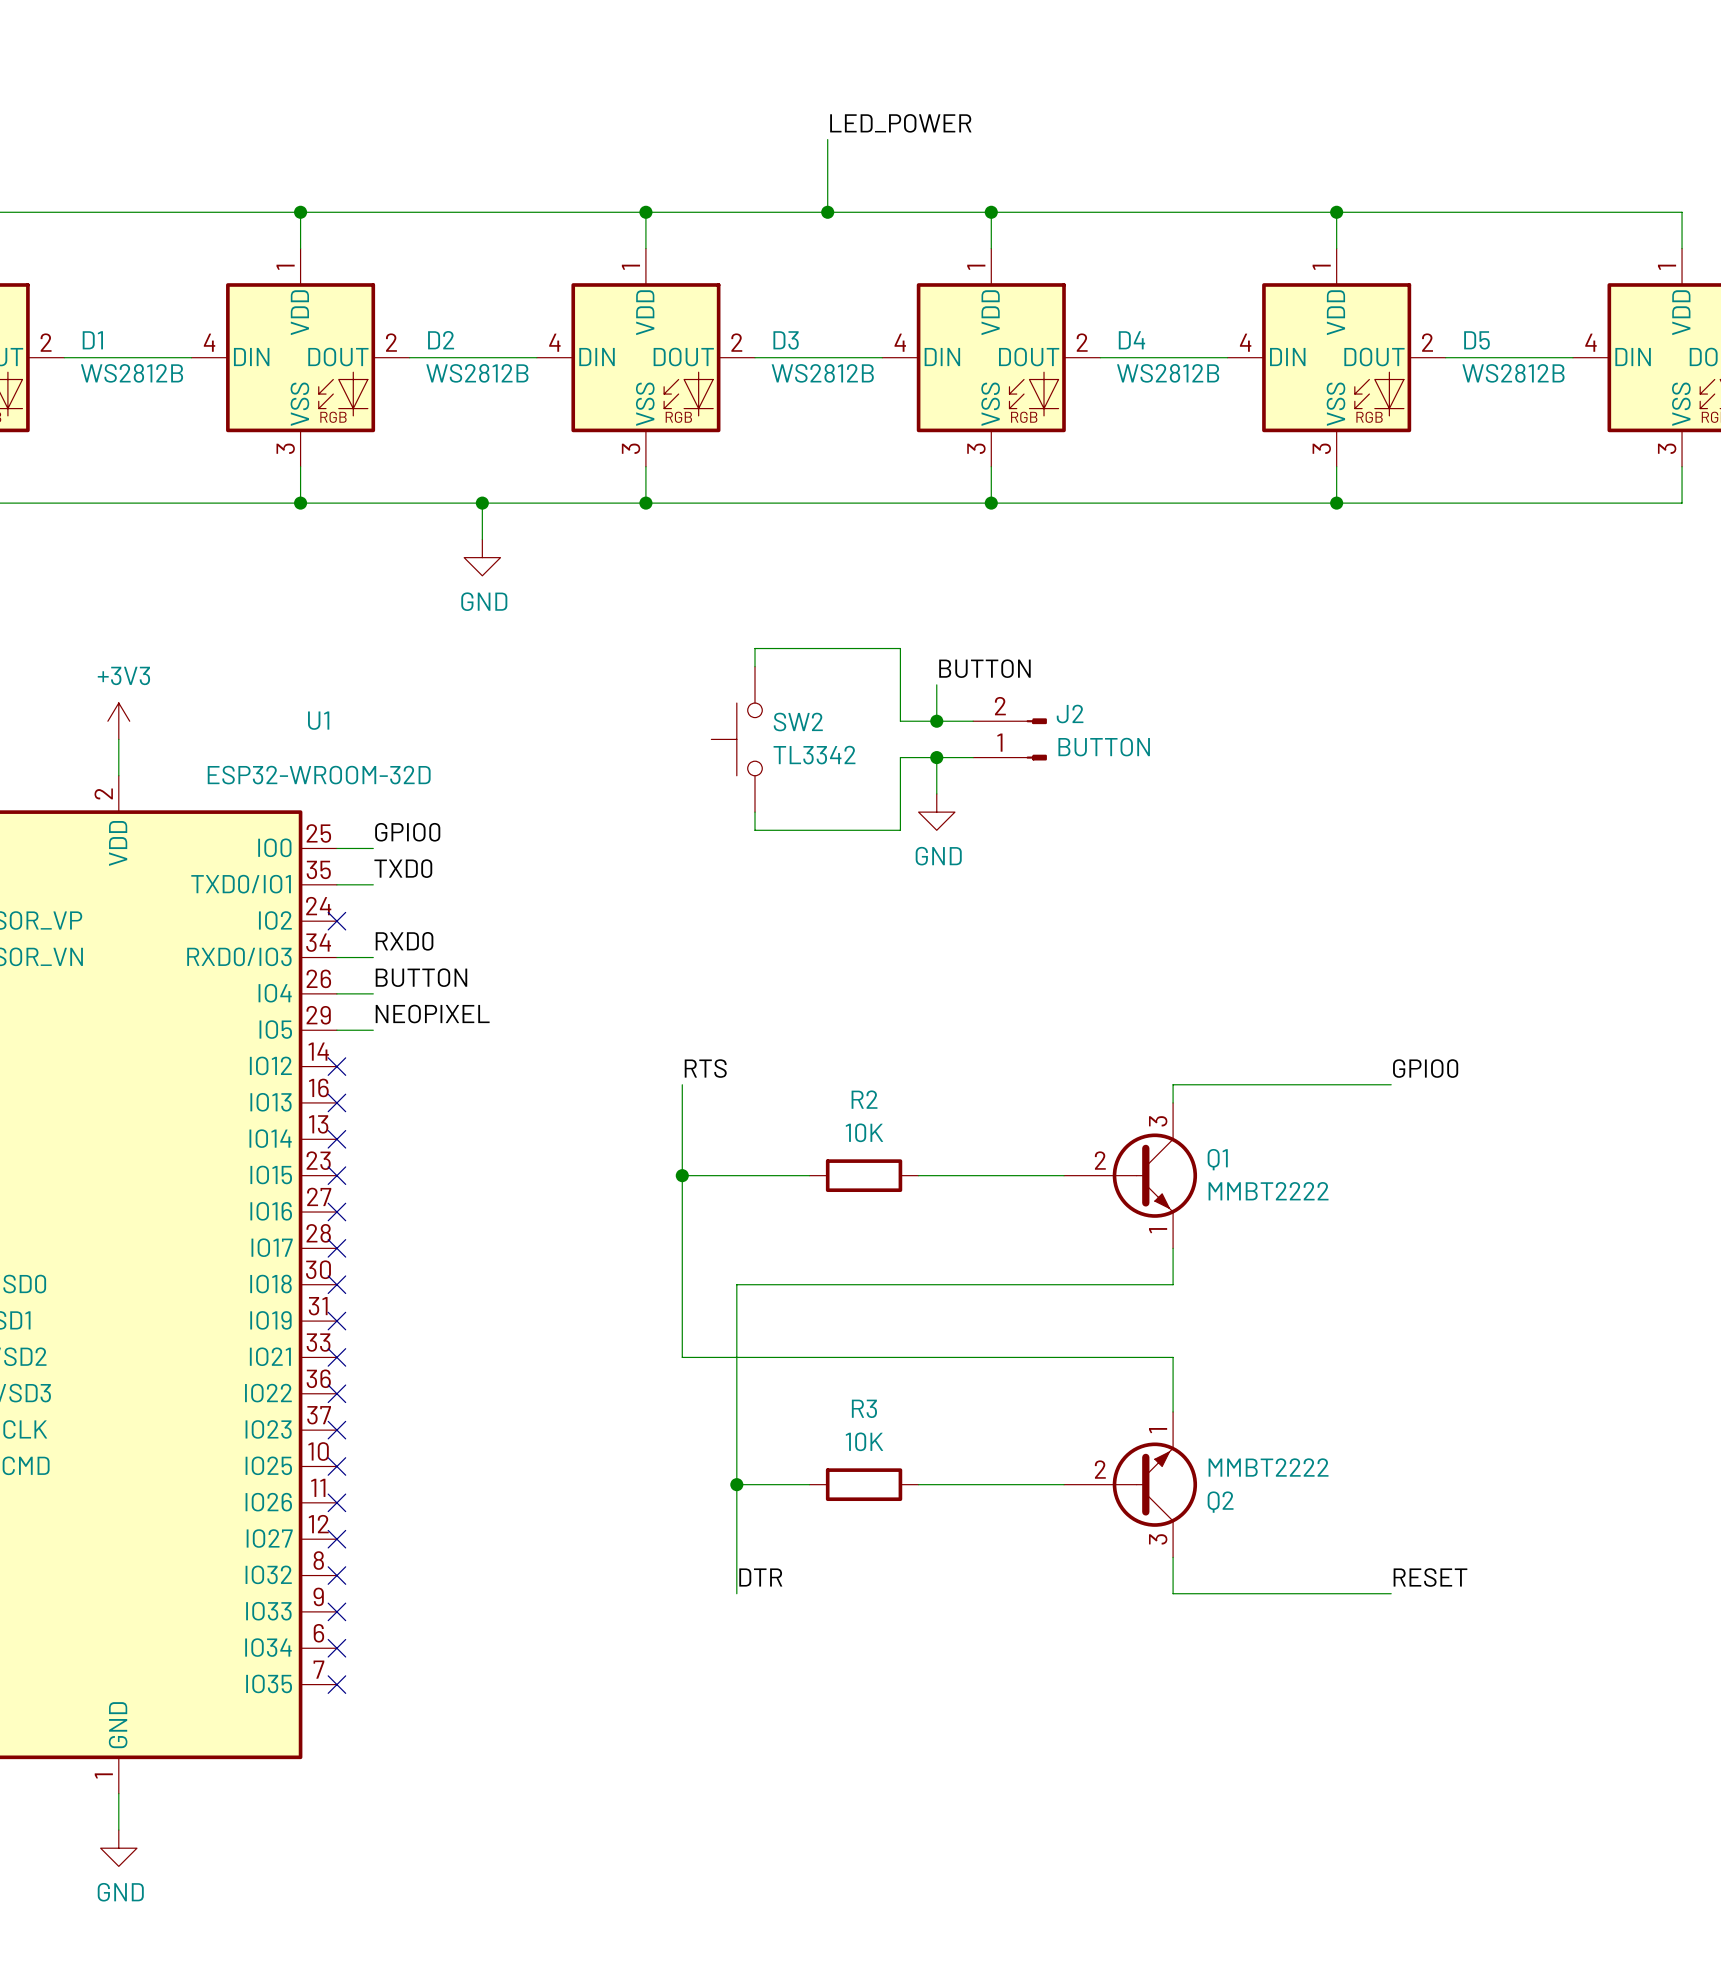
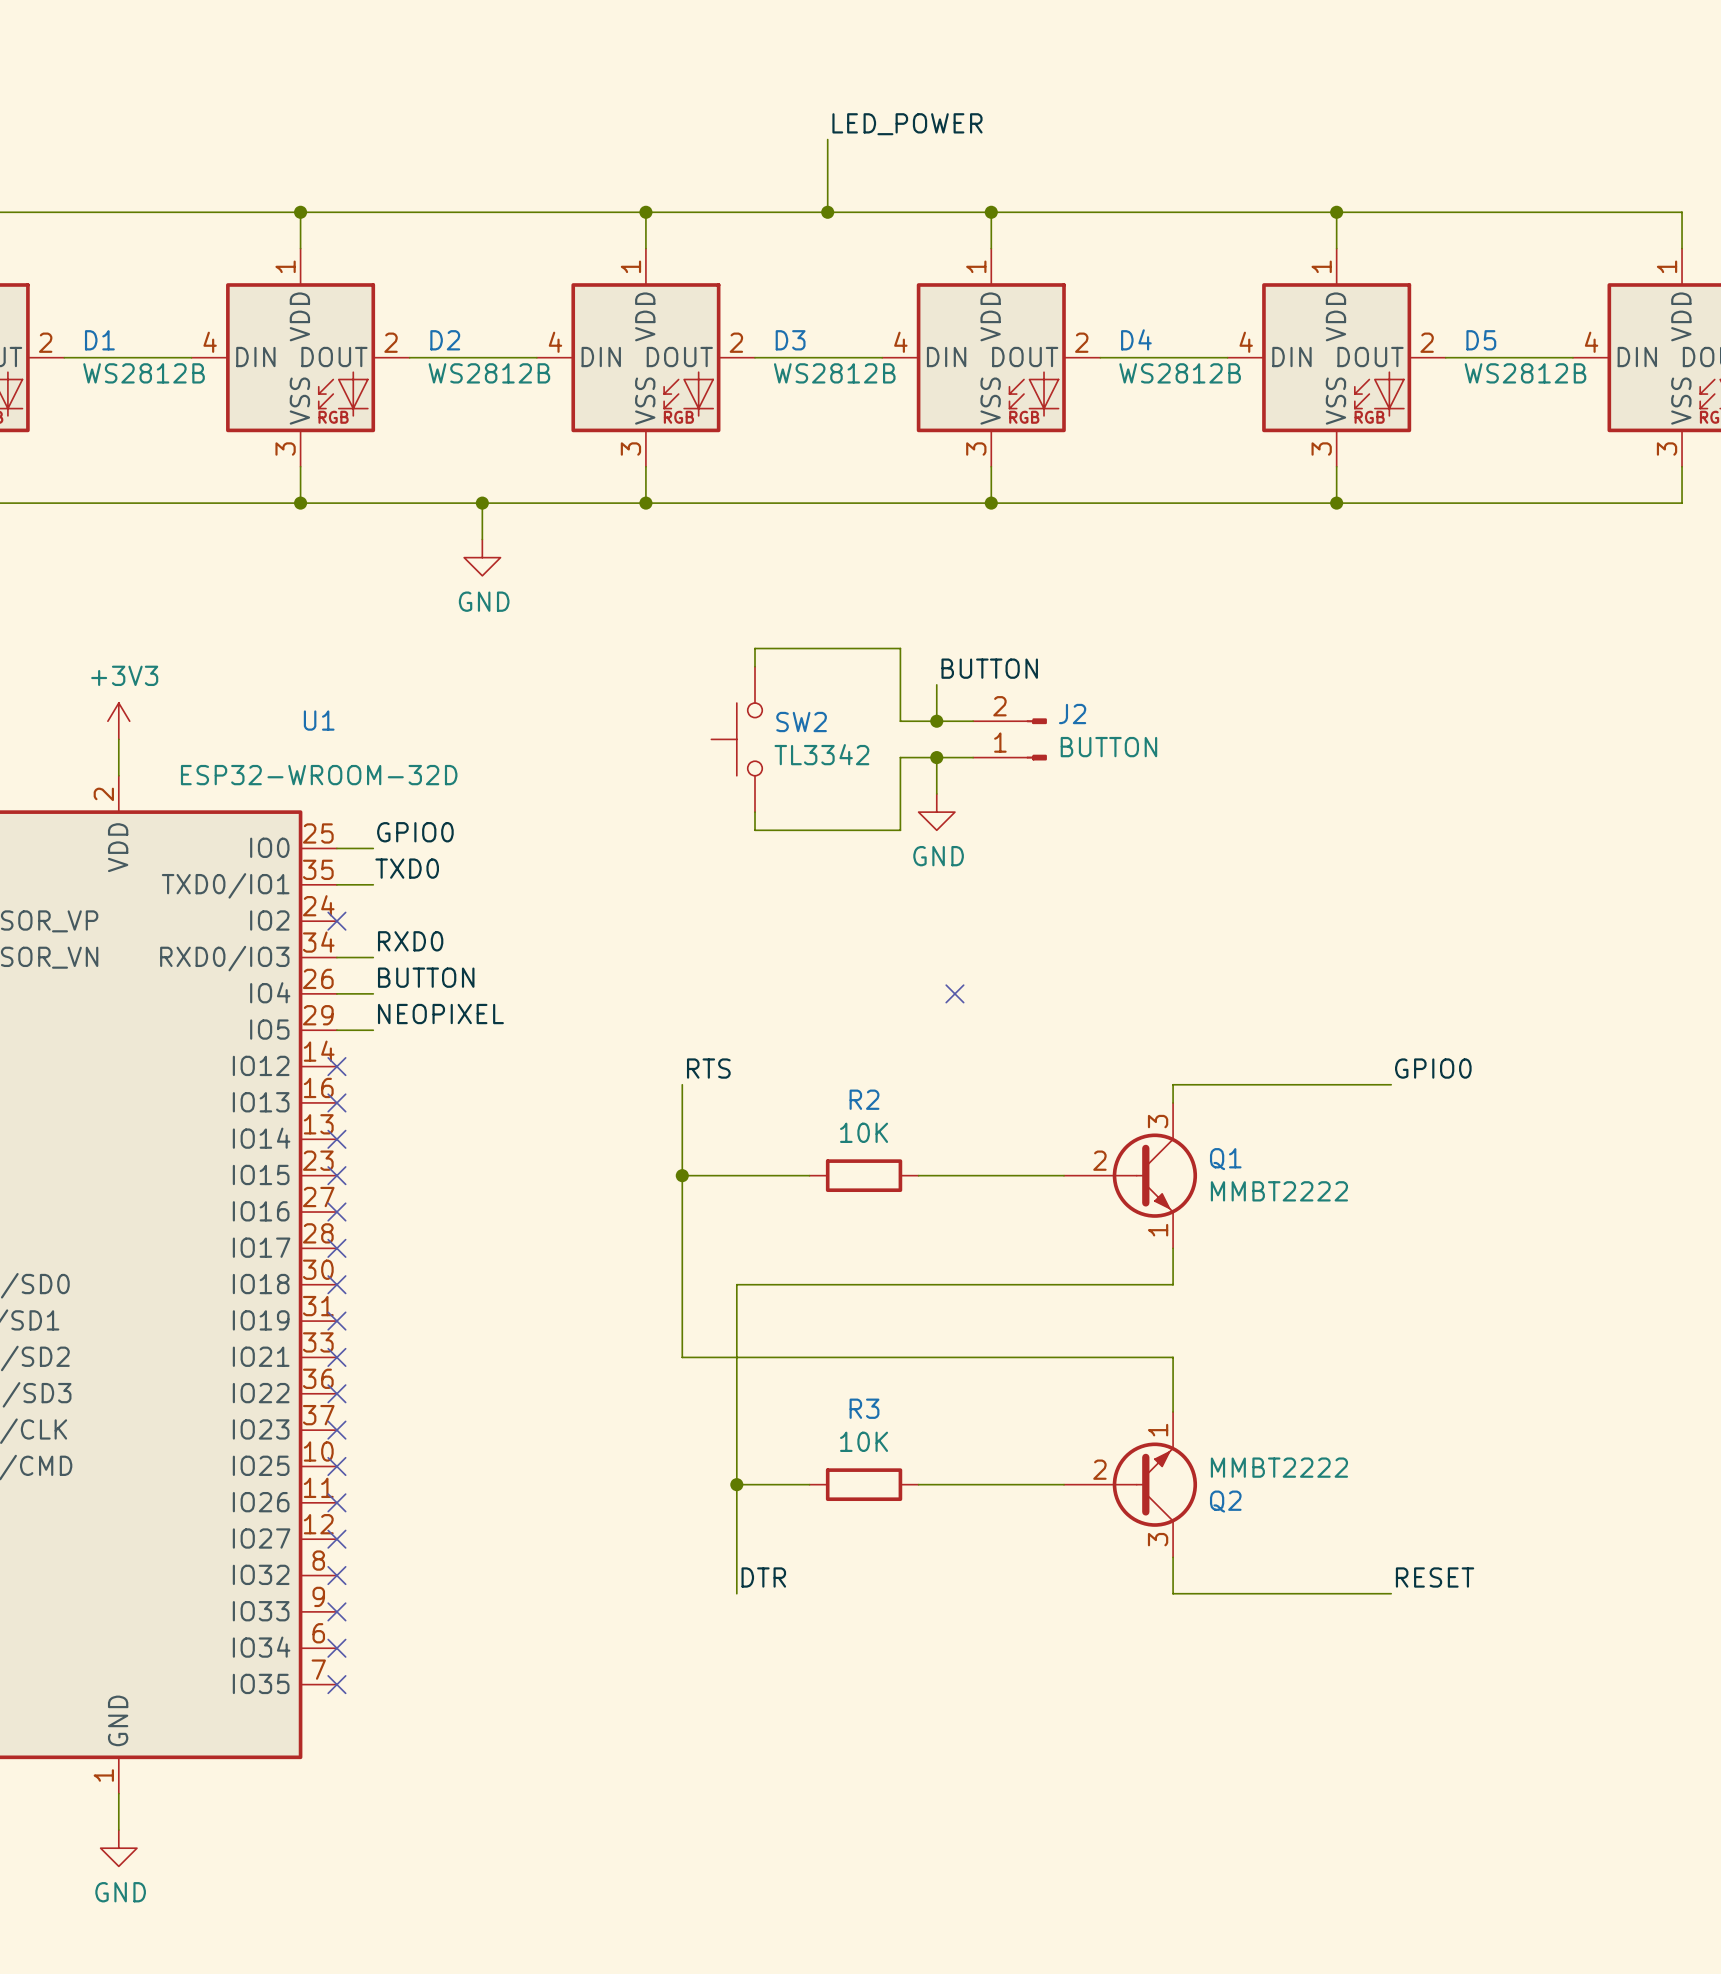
no-connect mark: none -> (954, 993)

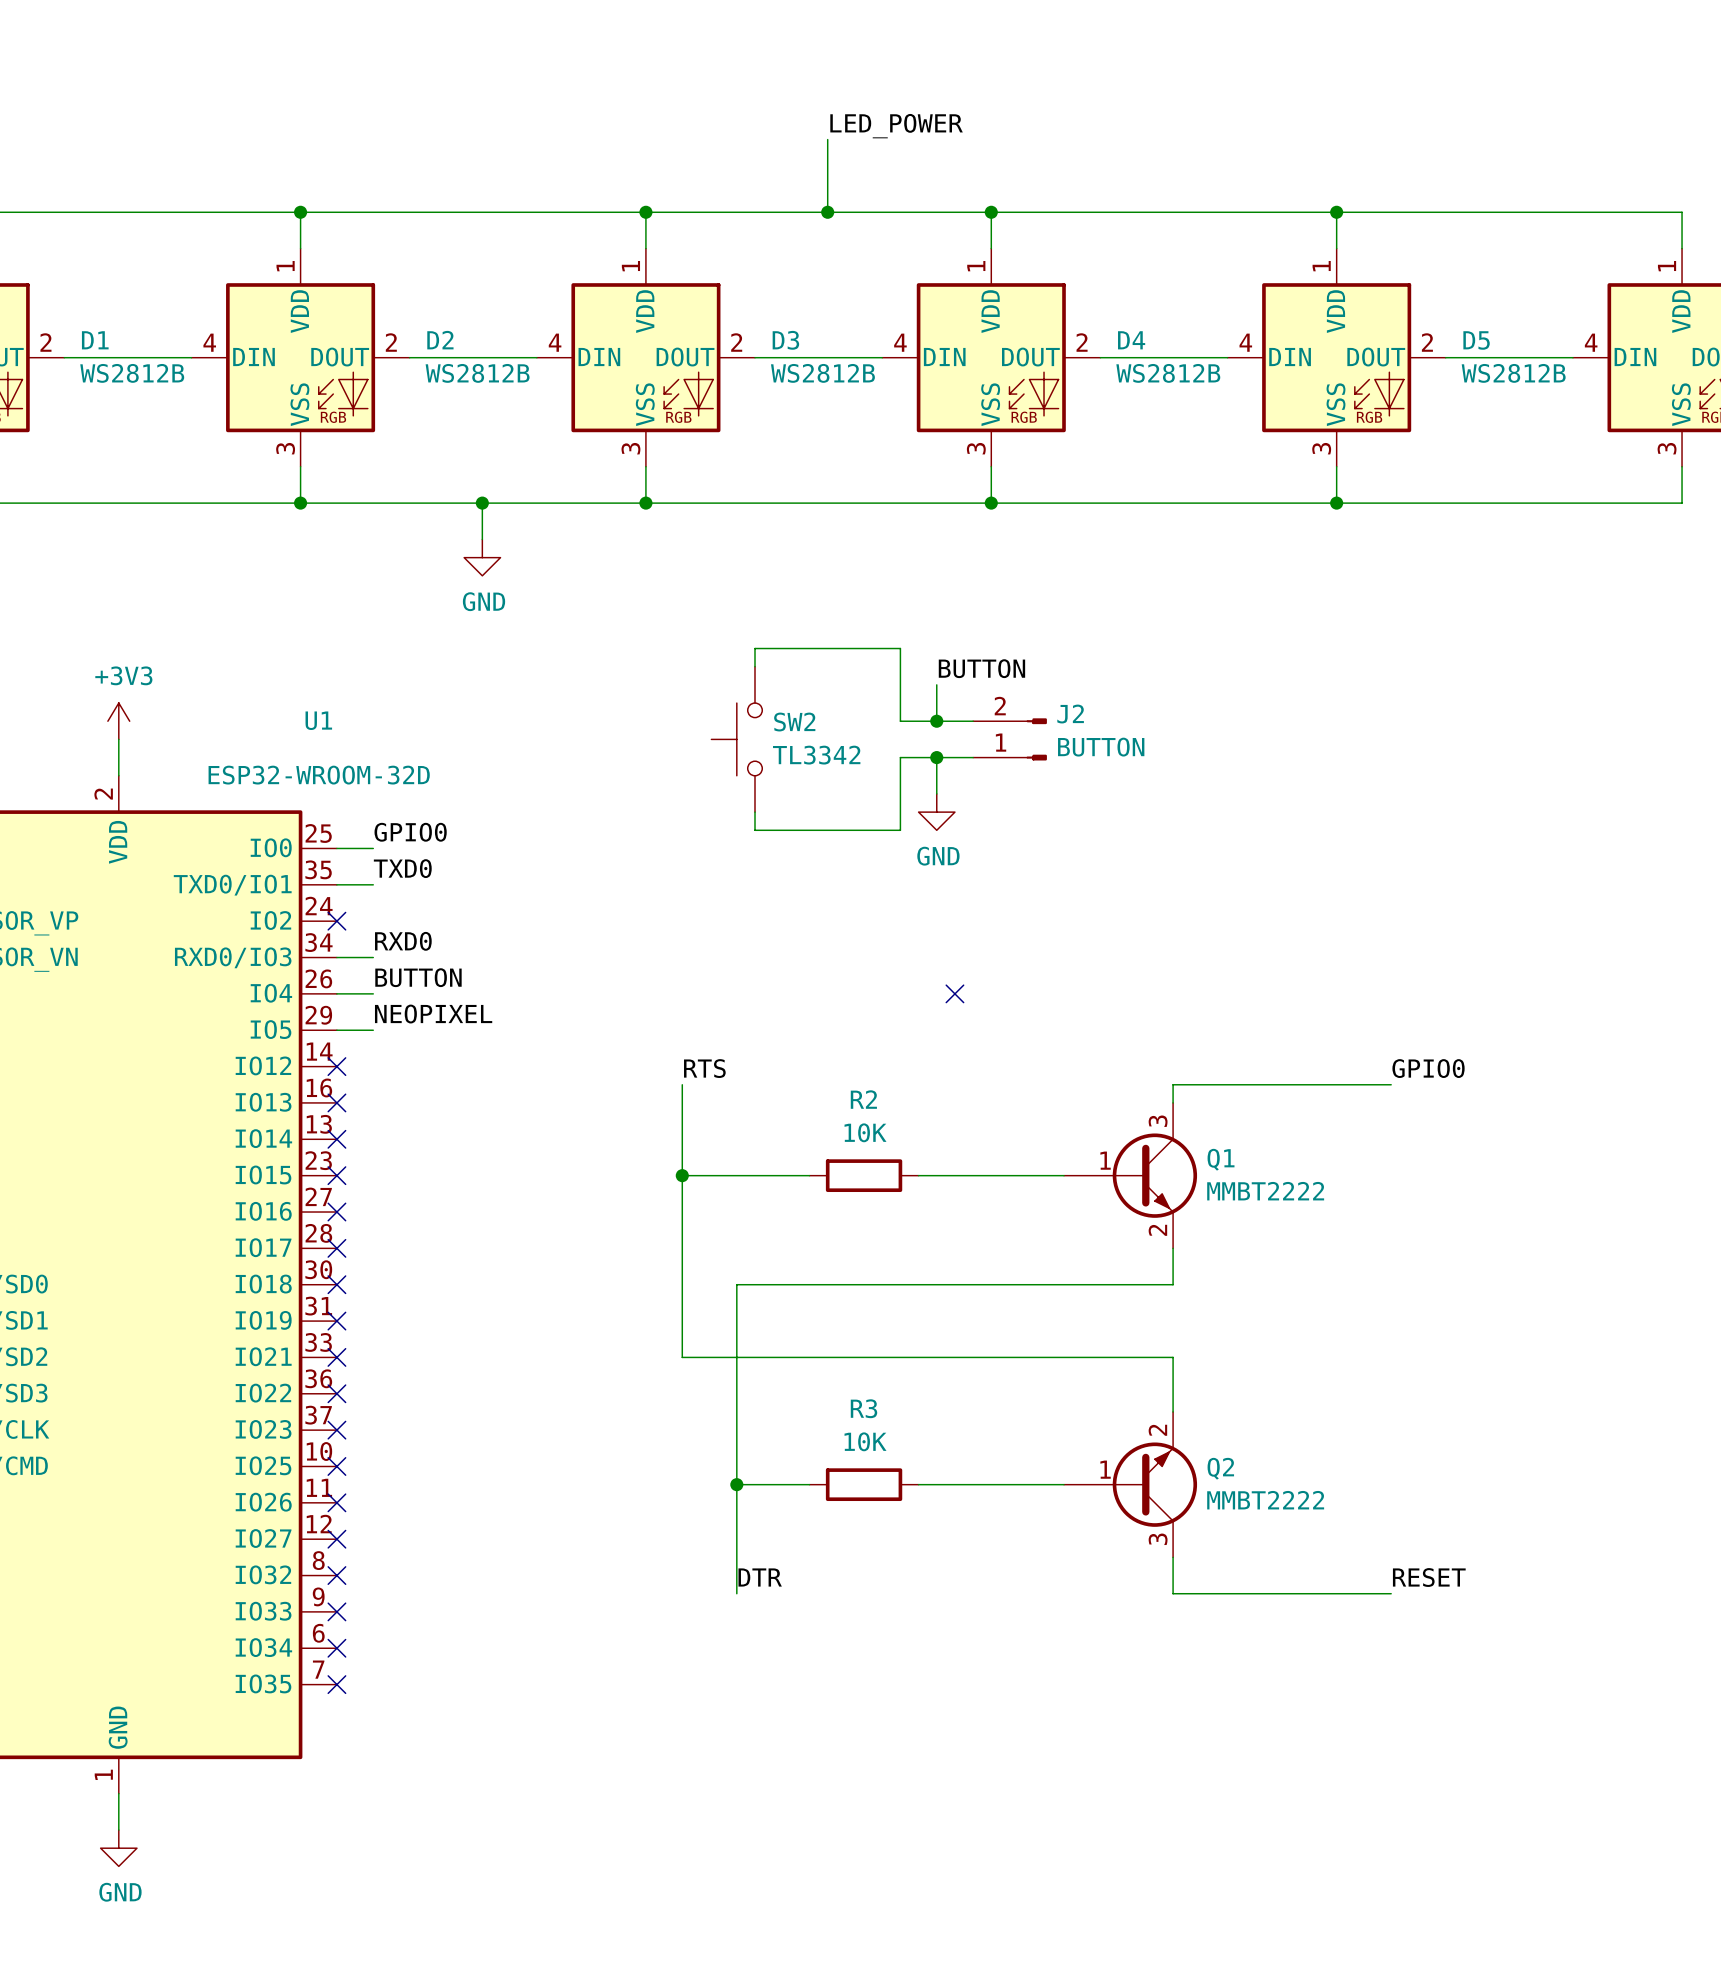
Q1 symbol: [1064, 1102, 1198, 1249] -> [1064, 1102, 1198, 1249]
Q2 symbol: [1064, 1411, 1198, 1558] -> [1064, 1411, 1198, 1558]
Q2 value position: MMBT2222 (1279, 1467) -> MMBT2222 (1265, 1500)
Q2 name position: Q2 (1225, 1501) -> Q2 (1220, 1468)

